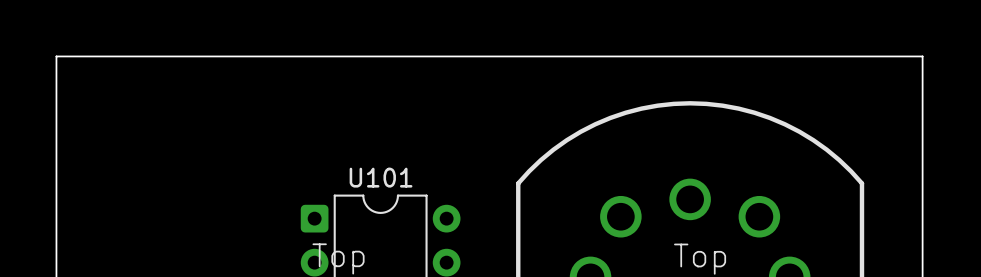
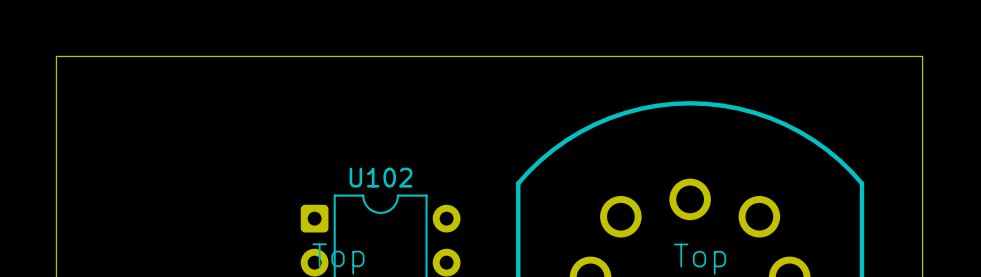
U101 name: U101 (381, 177) -> U102 (381, 177)

